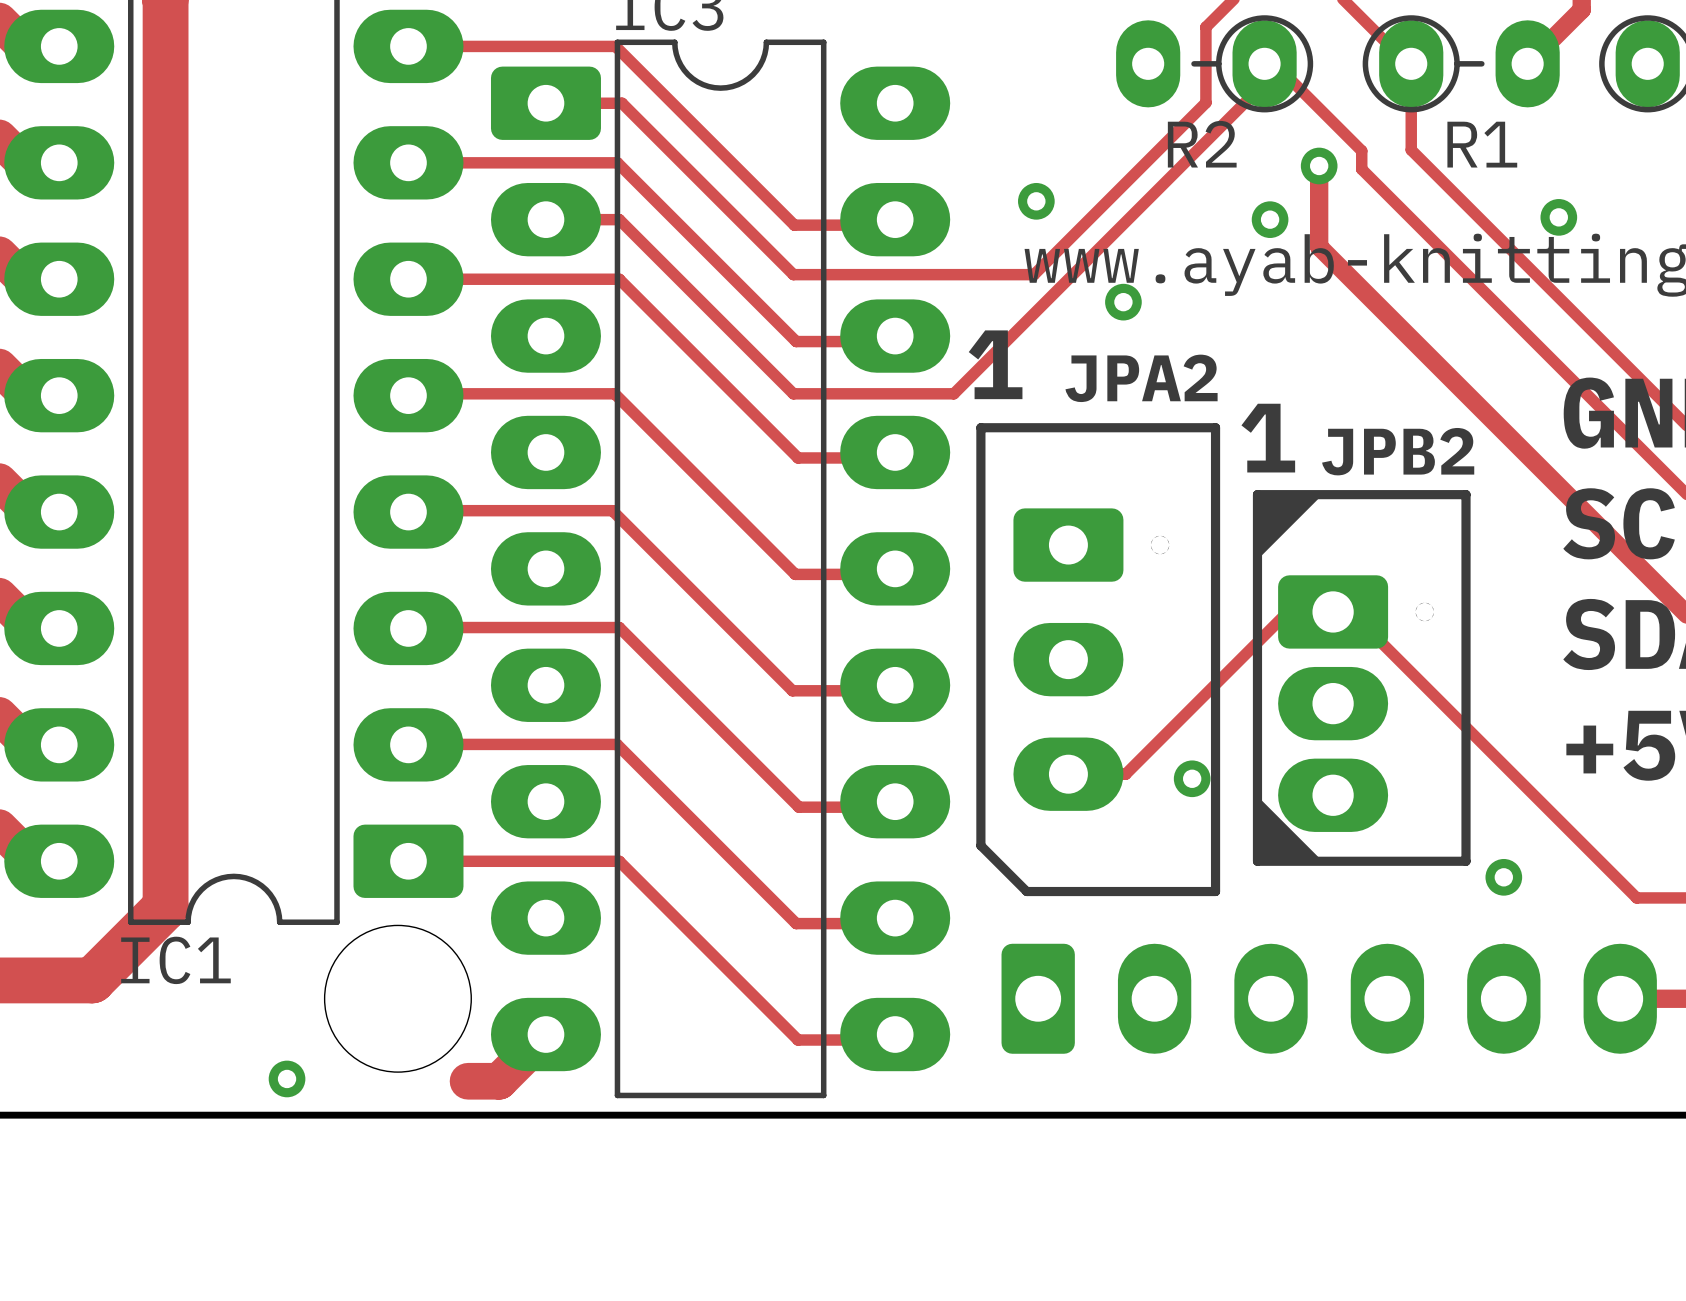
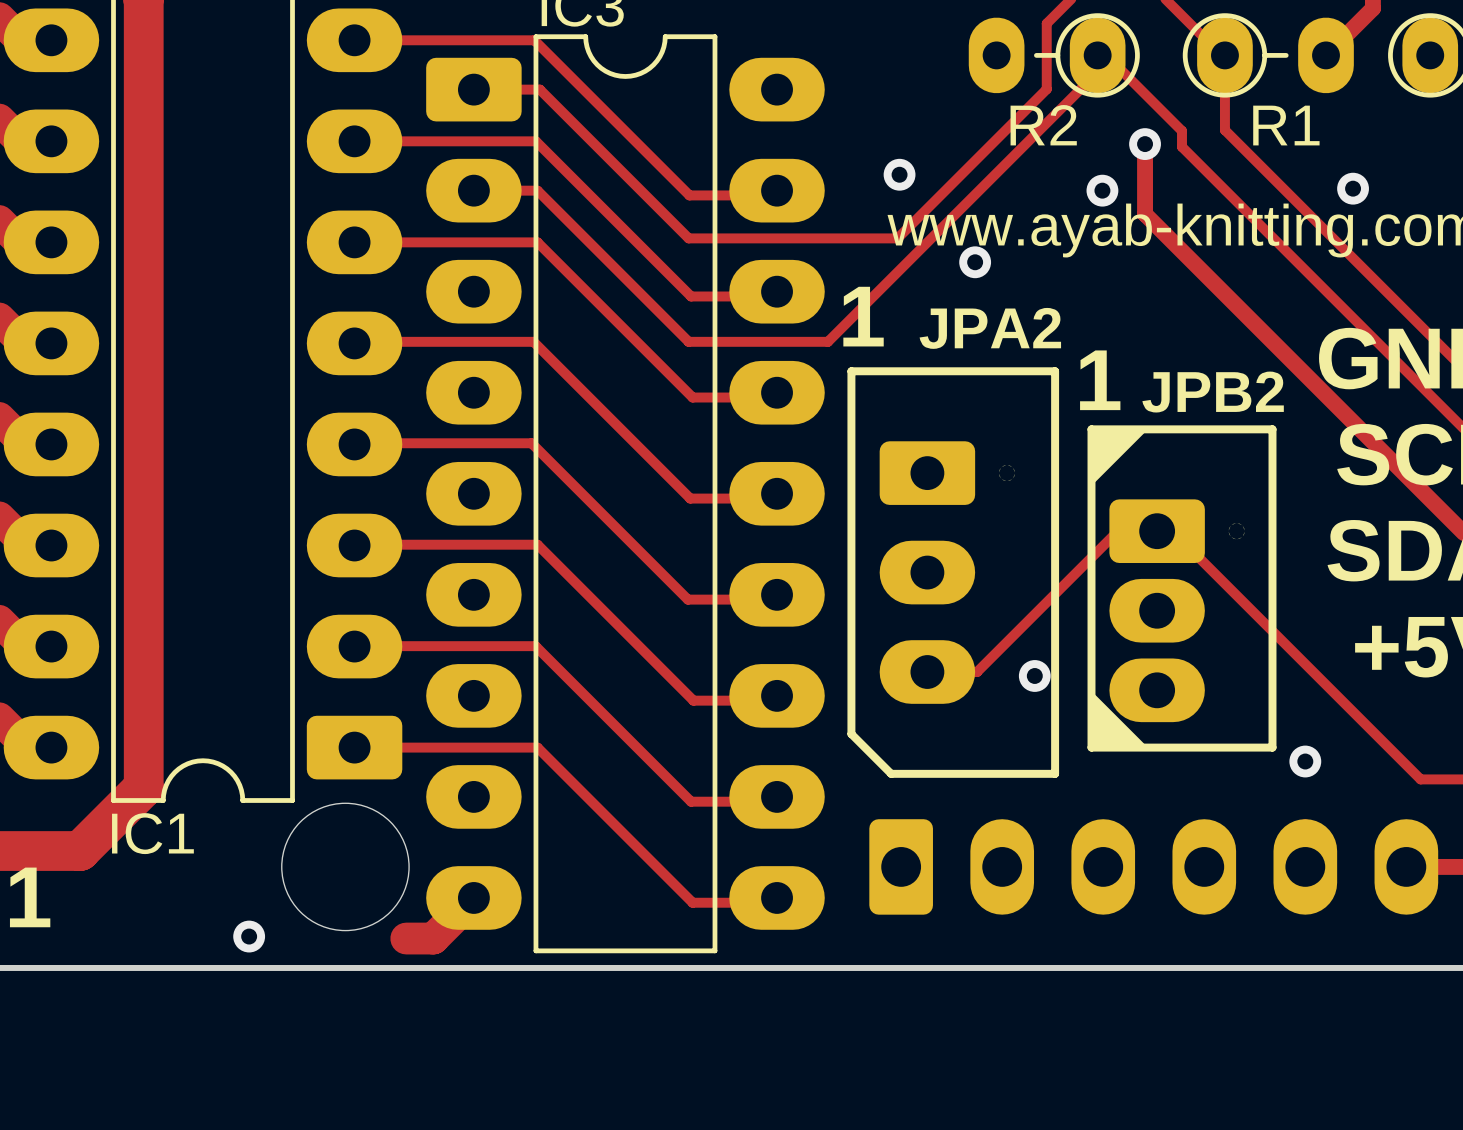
text: none -> 1 (30, 897)

